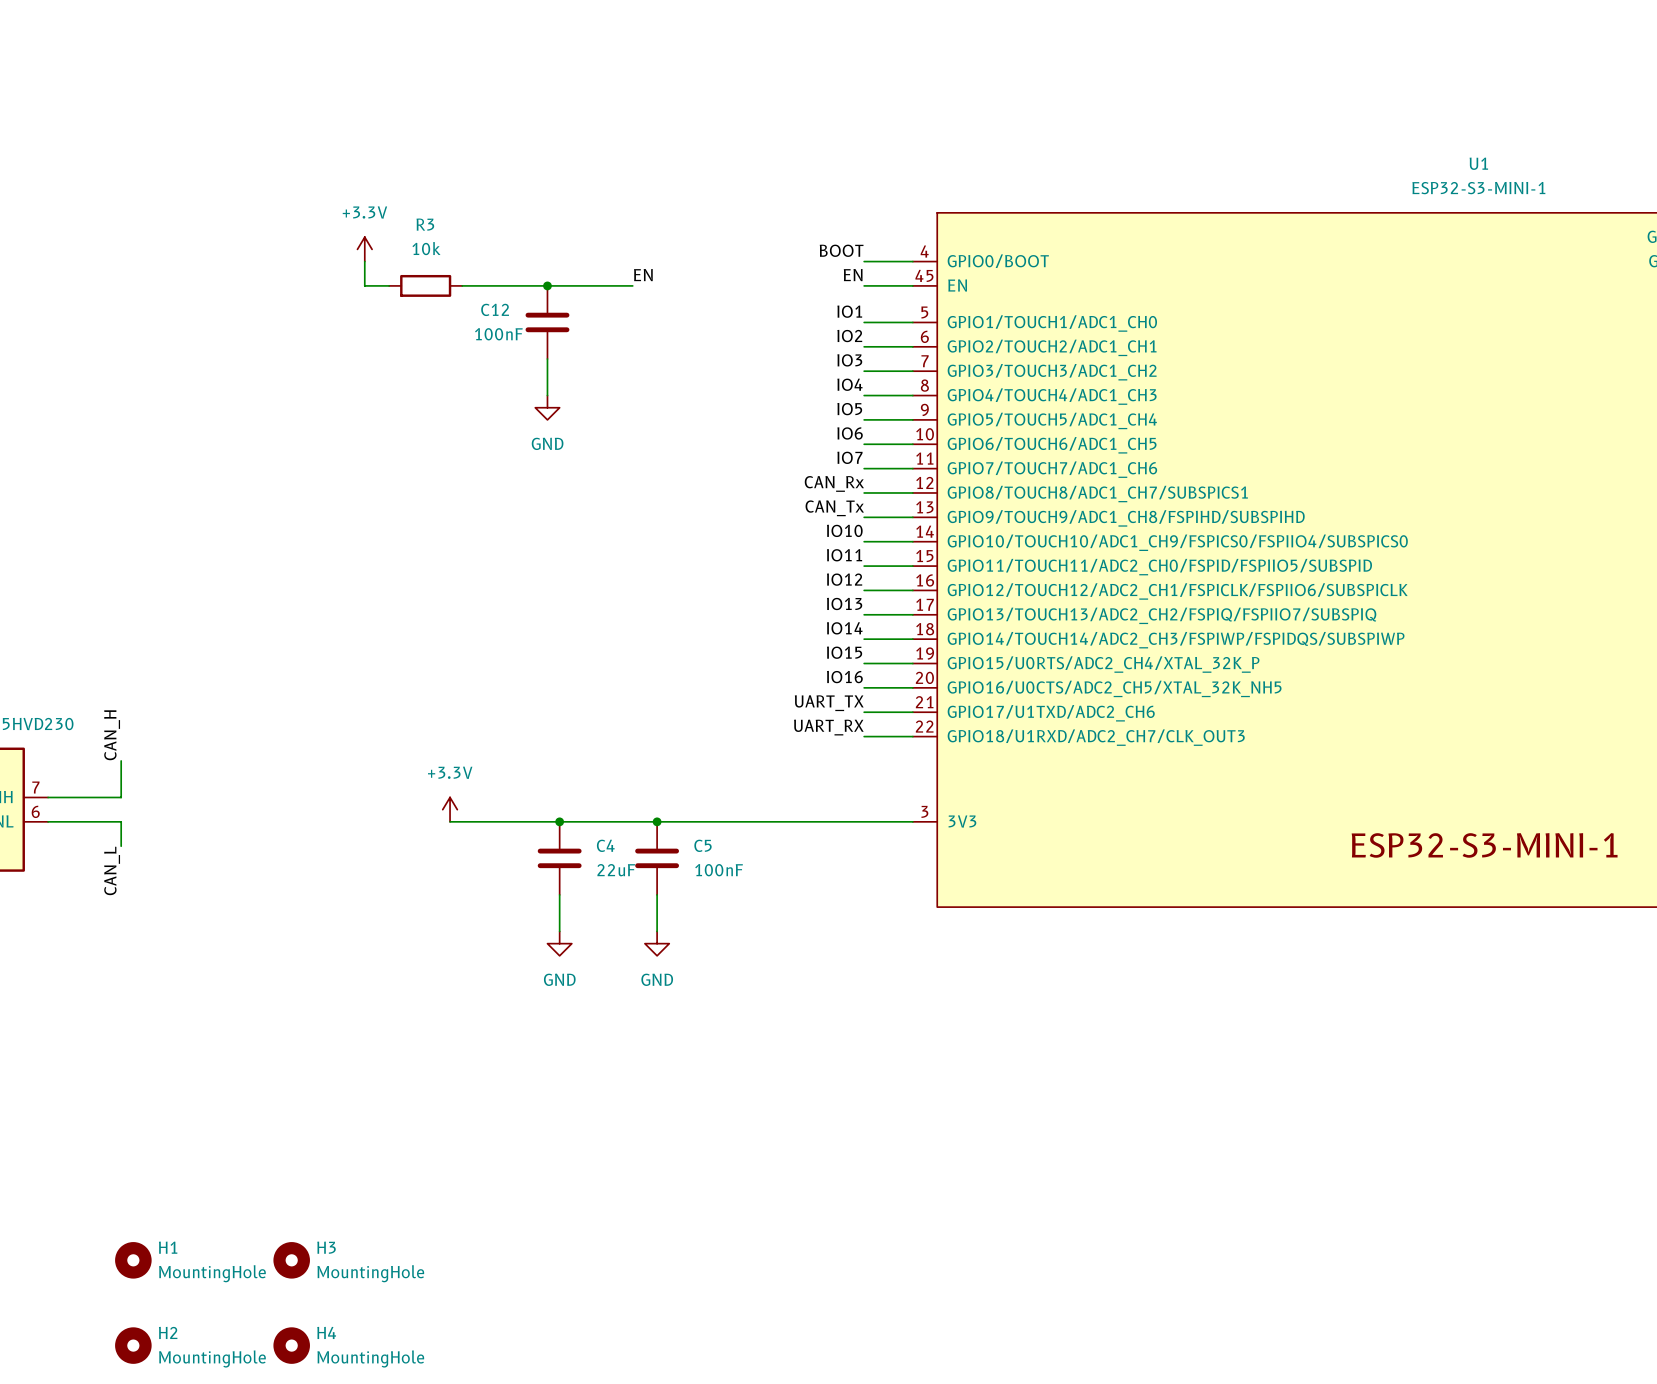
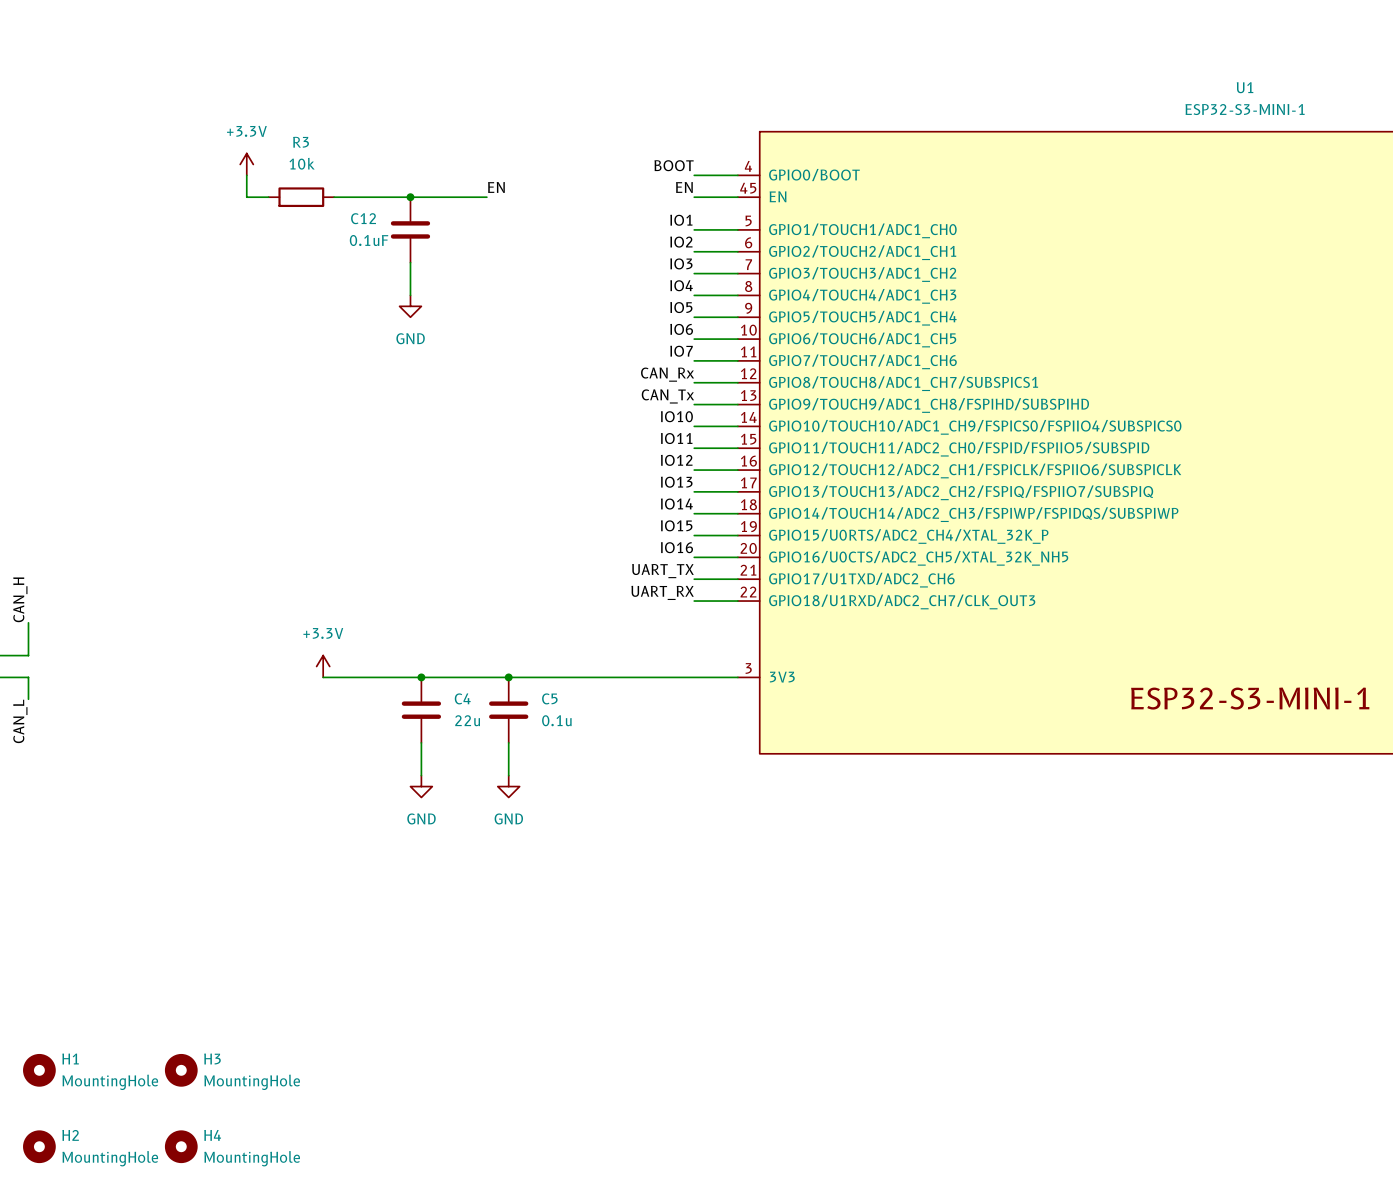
C12 value: 100nF (498, 334) -> 0.1uF (369, 240)
C4 value: 22uF (616, 870) -> 22u (467, 720)
C5 value: 100nF (719, 870) -> 0.1u (556, 720)

